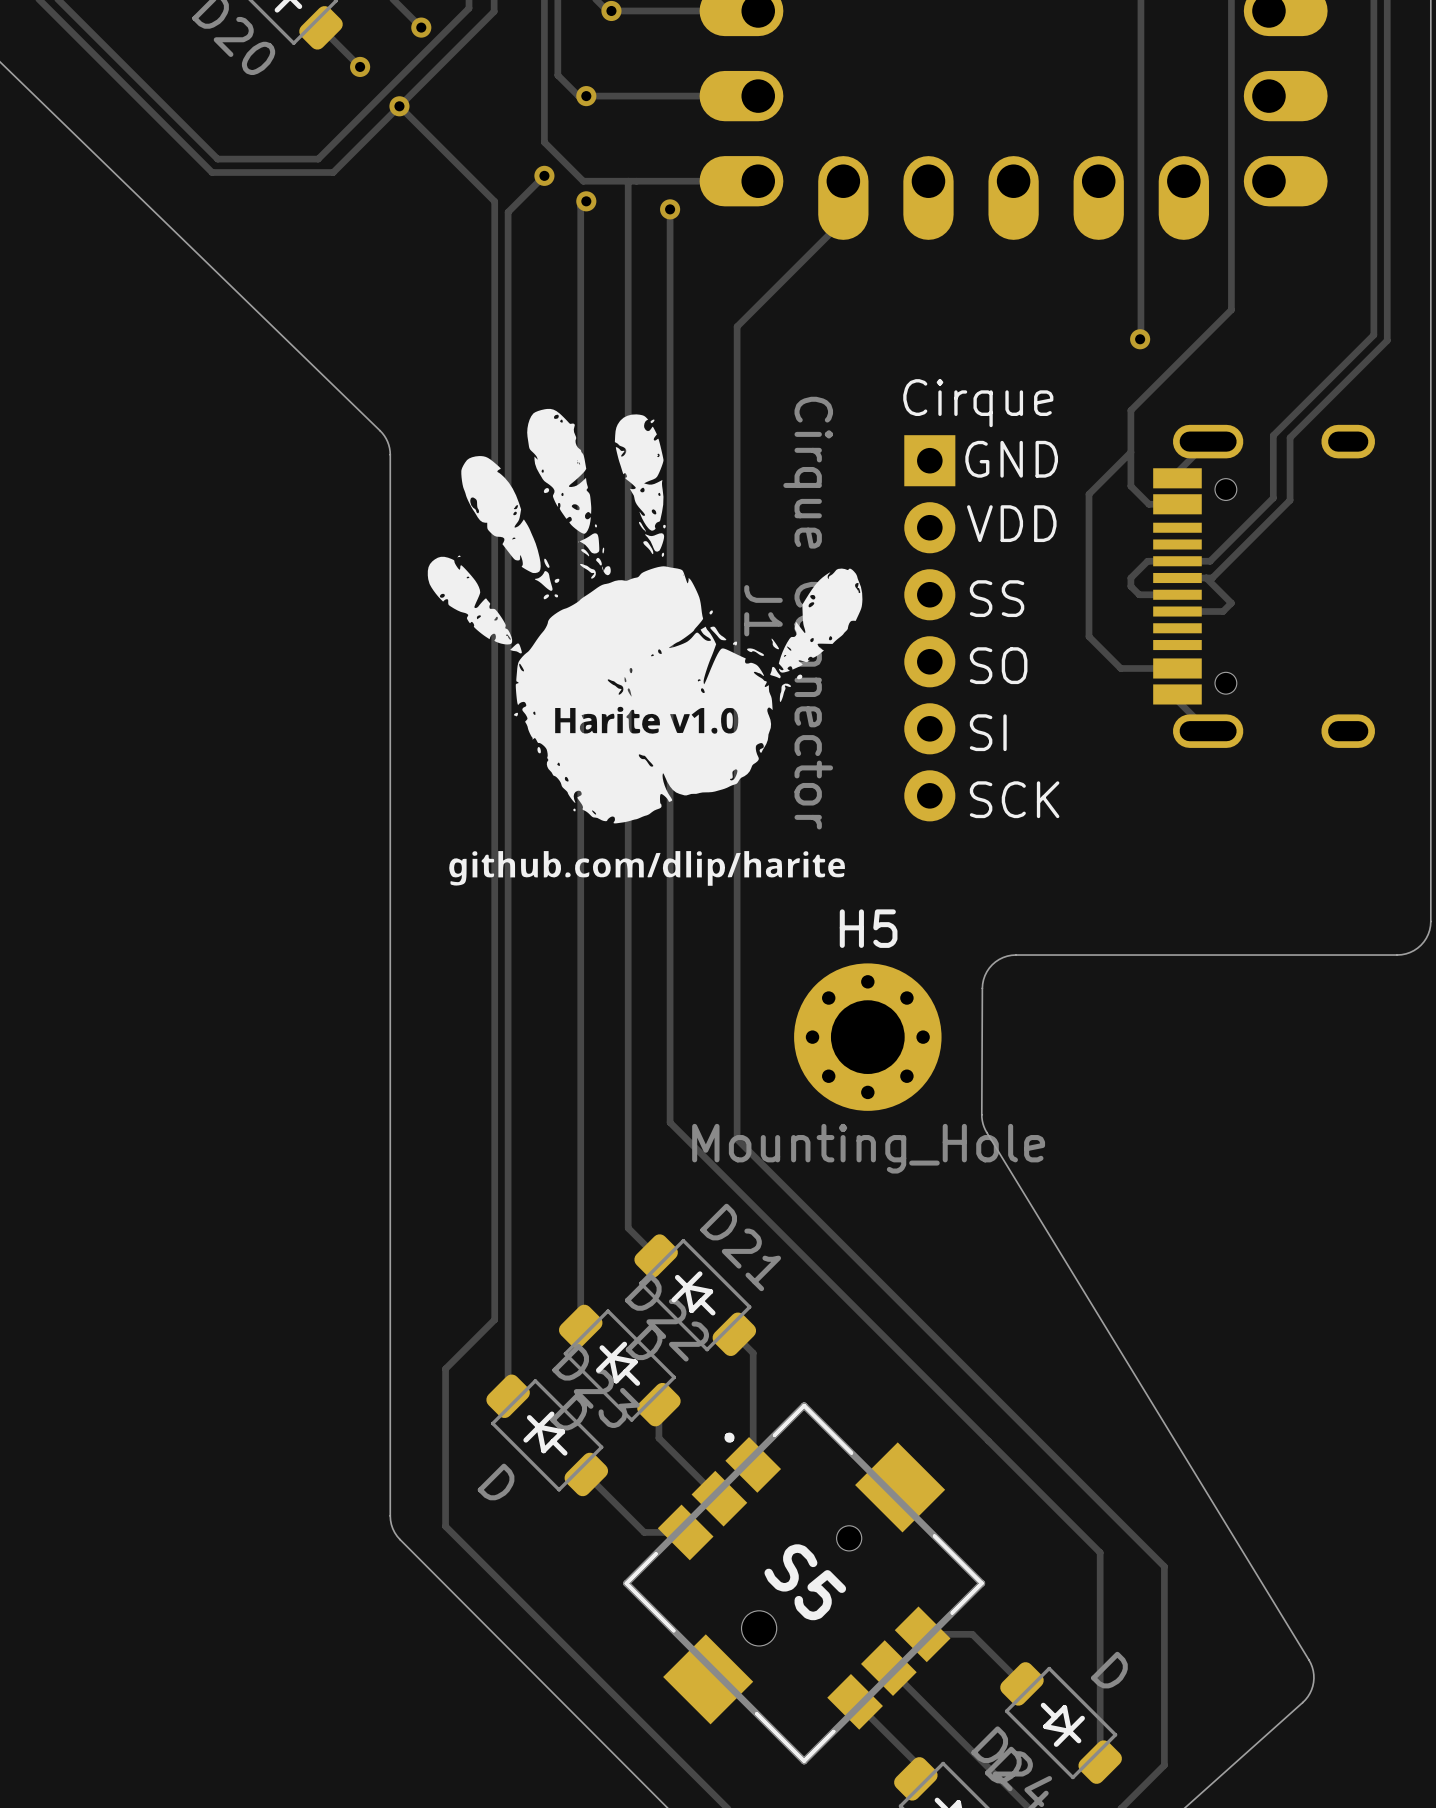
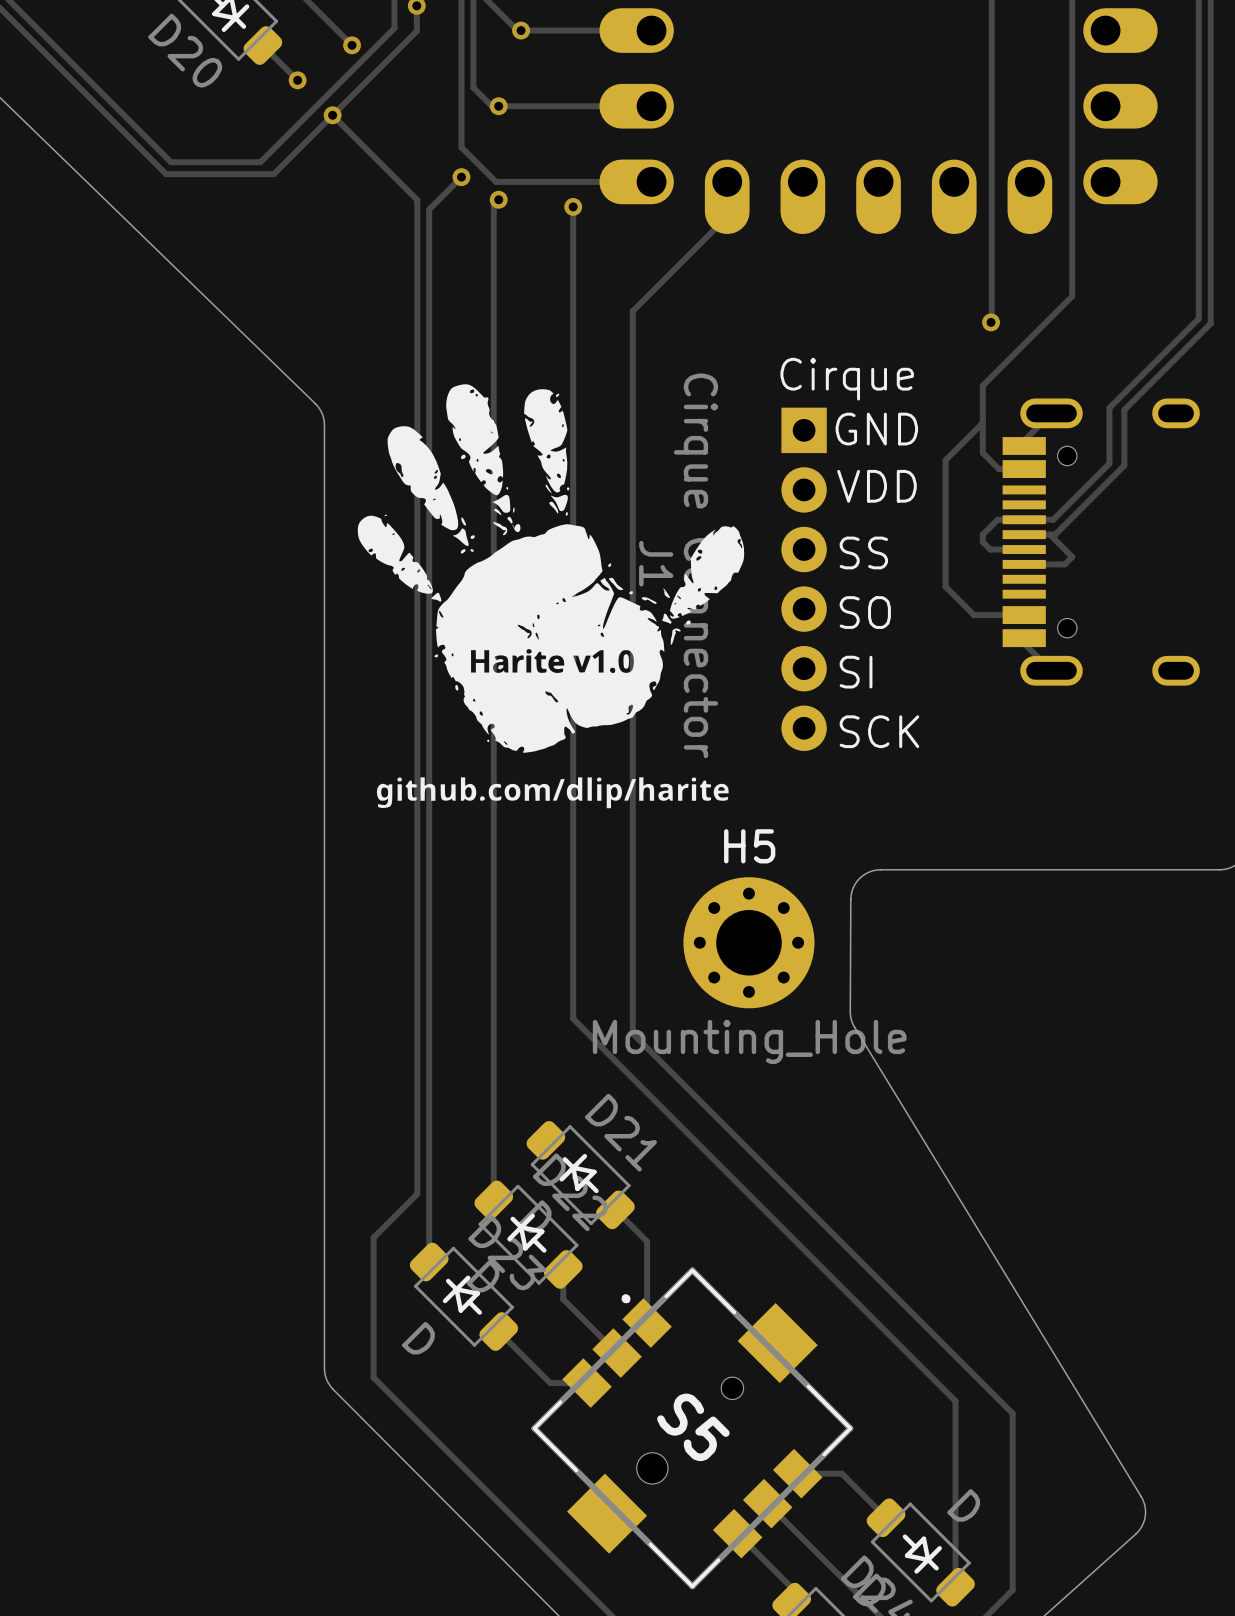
track: (628, 181) (628, 1228) (656, 1256) -> none
D21 position: (695, 1295) -> (580, 1175)
track: (734, 1334) (753, 1353) (753, 1373) -> (615, 1209) (647, 1241)

